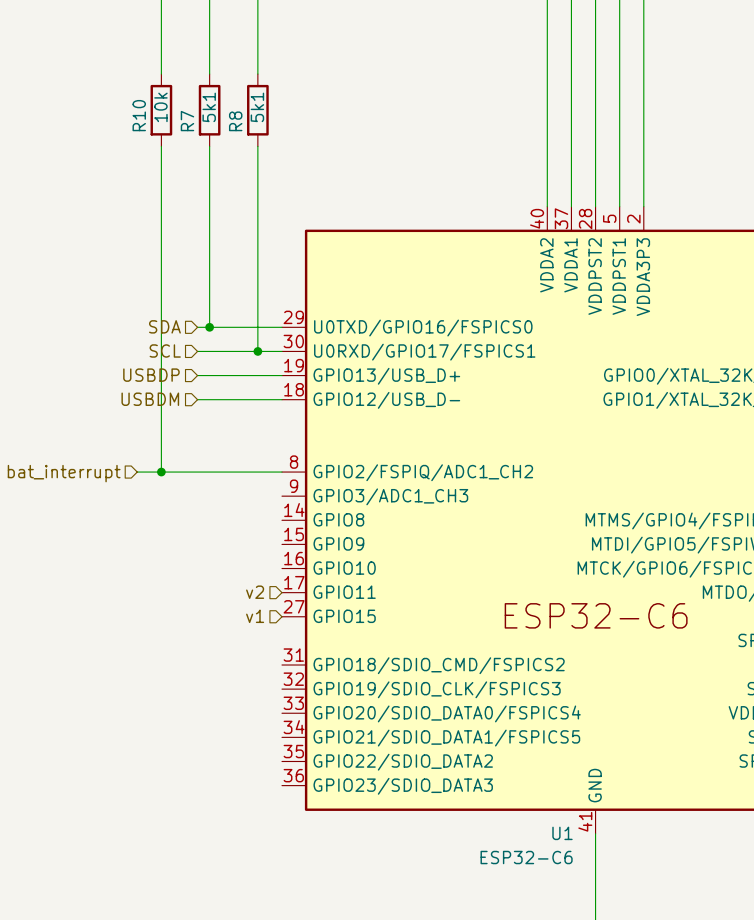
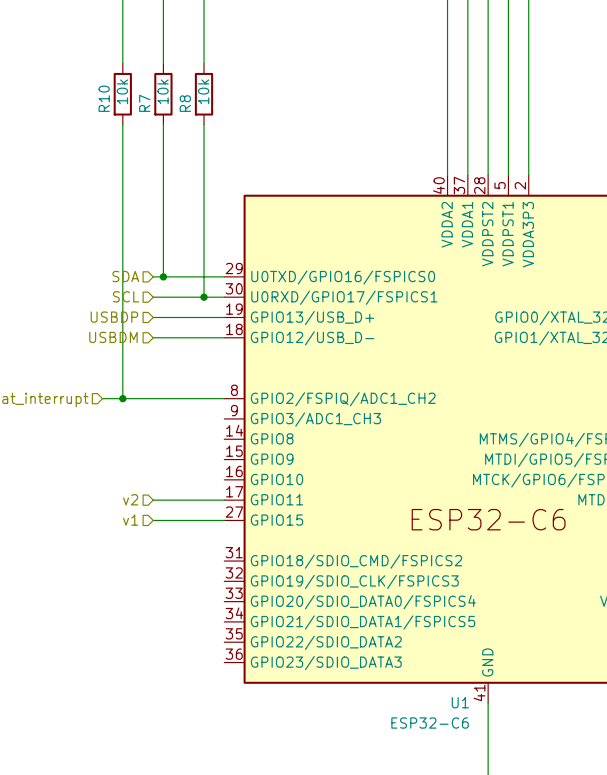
R7 value: 5k1 (209, 107) -> 10k (163, 91)
R8 value: 5k1 (257, 107) -> 10k (203, 91)
wire: none -> (153, 500) (224, 500)
hierarchical label position: v2 (255, 592) -> v2 (130, 499)
wire: none -> (153, 520) (224, 520)
hierarchical label position: v1 (255, 616) -> v1 (130, 520)

